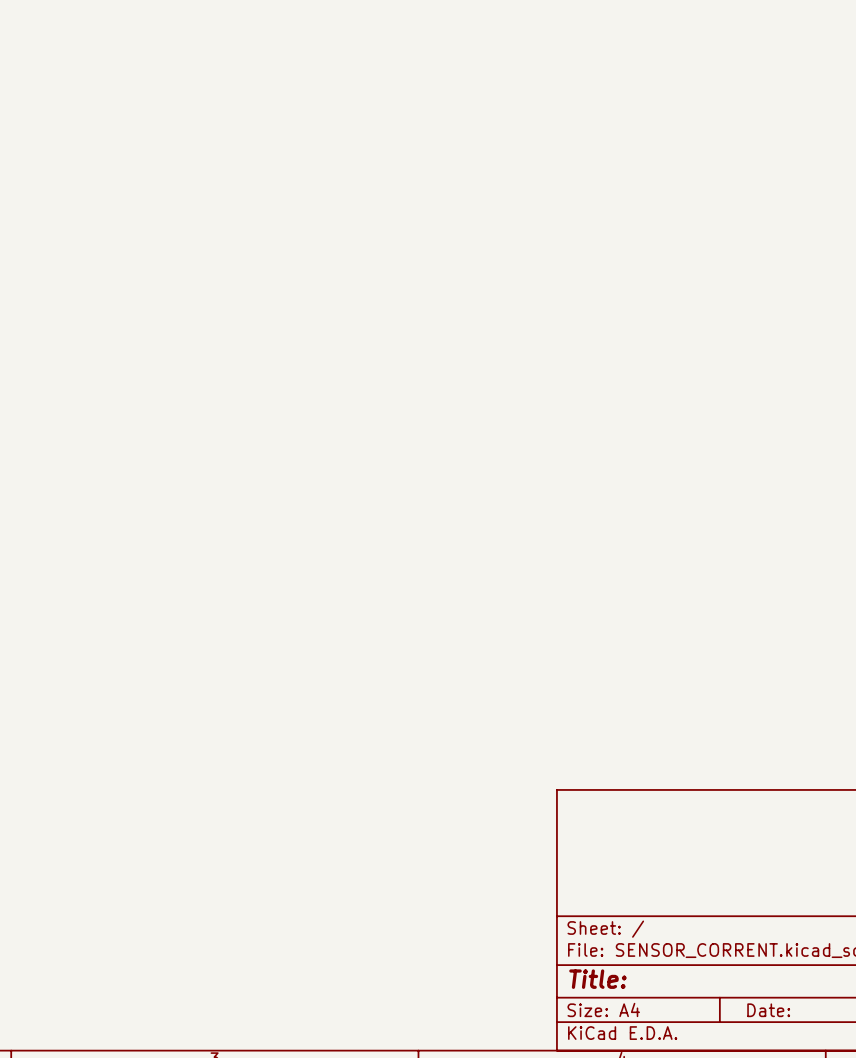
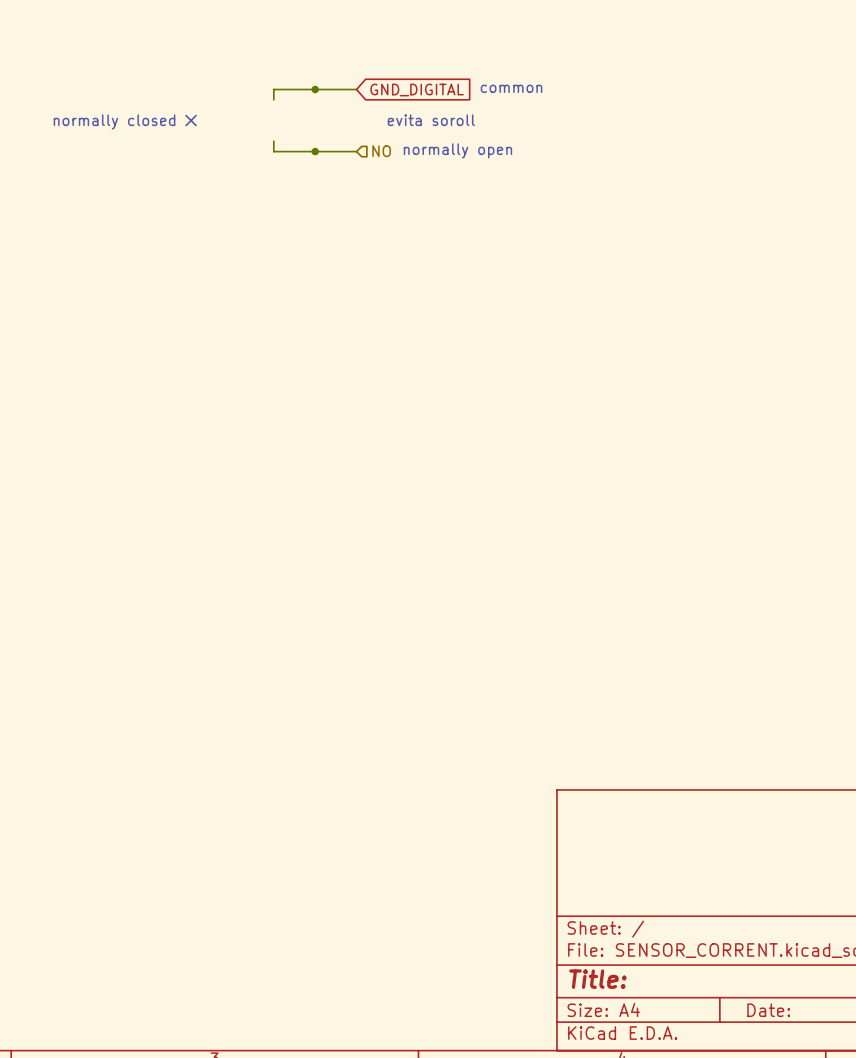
text: none -> common (511, 88)
junction: none -> (315, 89)
wire: none -> (356, 89) (273, 89) (273, 99)
global label: none -> GND_DIGITAL (417, 90)
no-connect mark: none -> (191, 120)
text: none -> evita soroll (431, 120)
text: none -> normally closed (114, 121)
wire: none -> (273, 141) (273, 151) (356, 151)
text: none -> normally open (457, 150)
junction: none -> (315, 151)
hierarchical label: none -> NO (381, 151)

